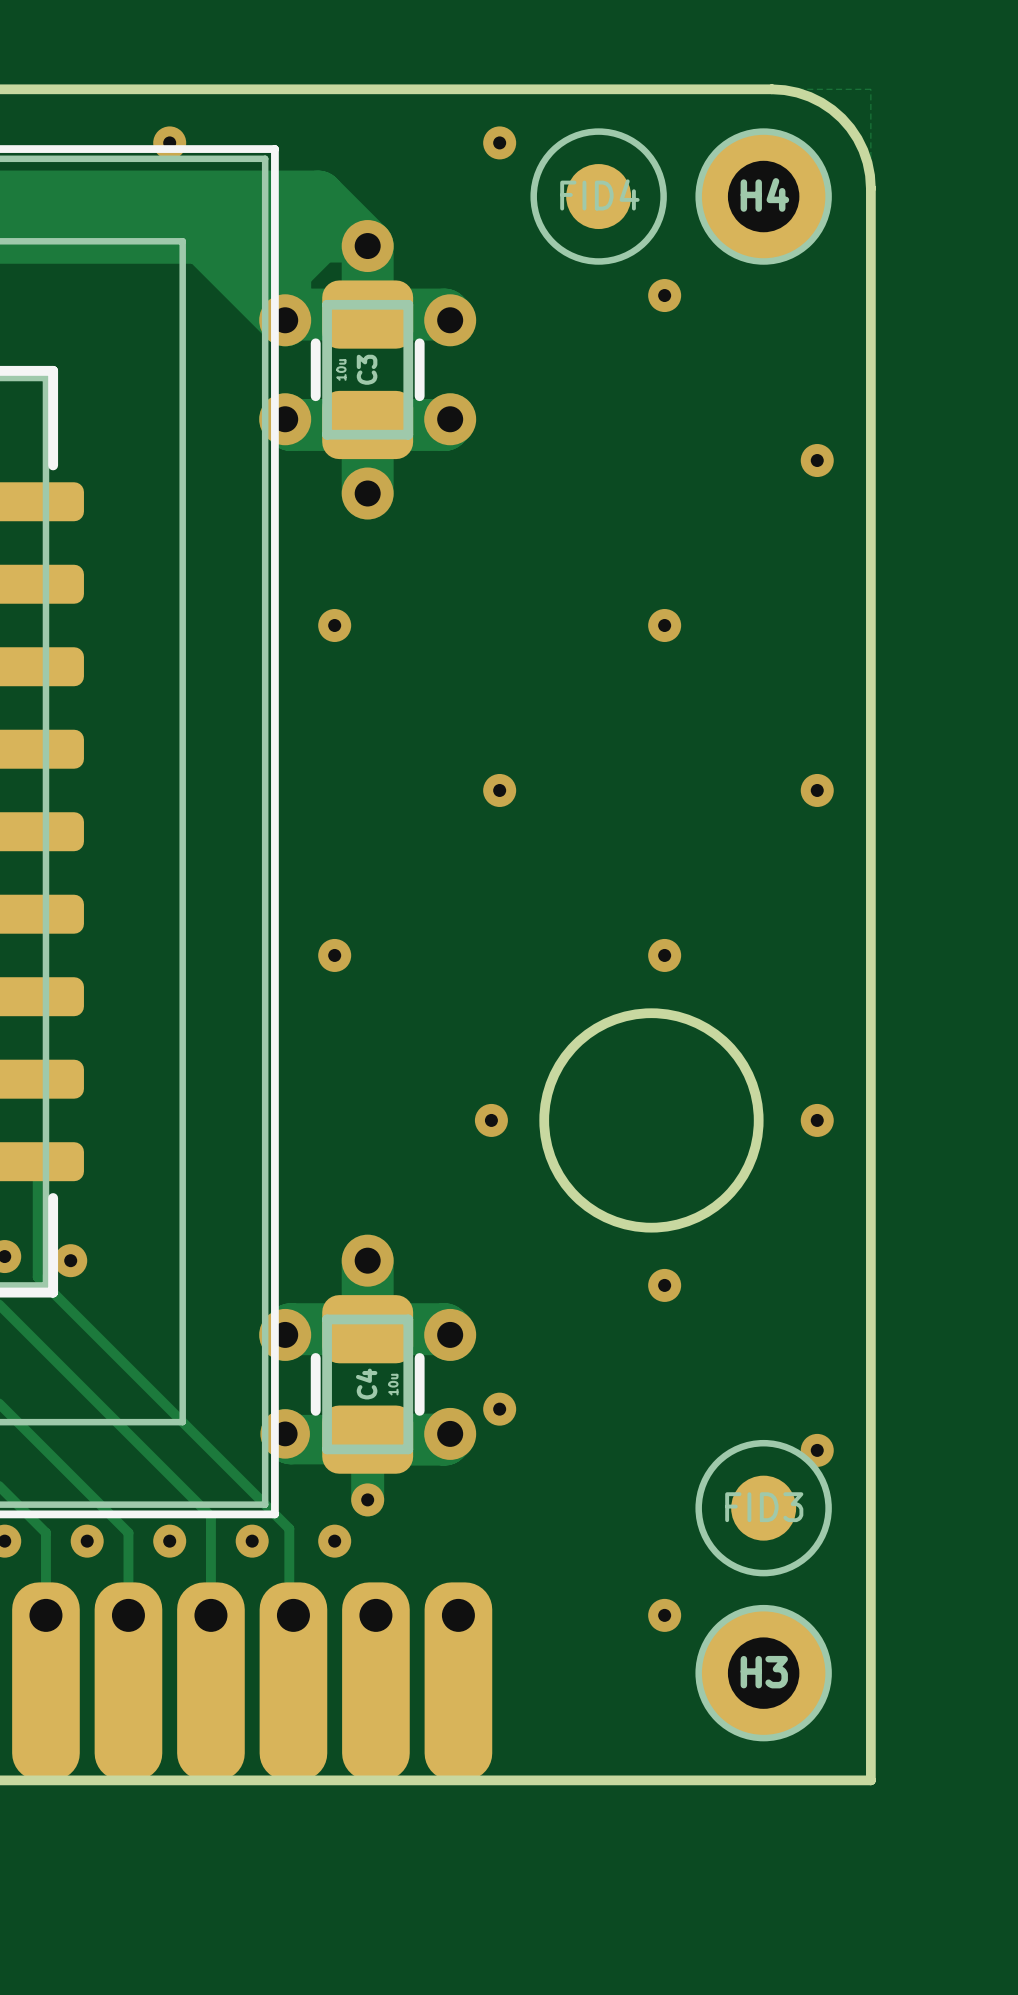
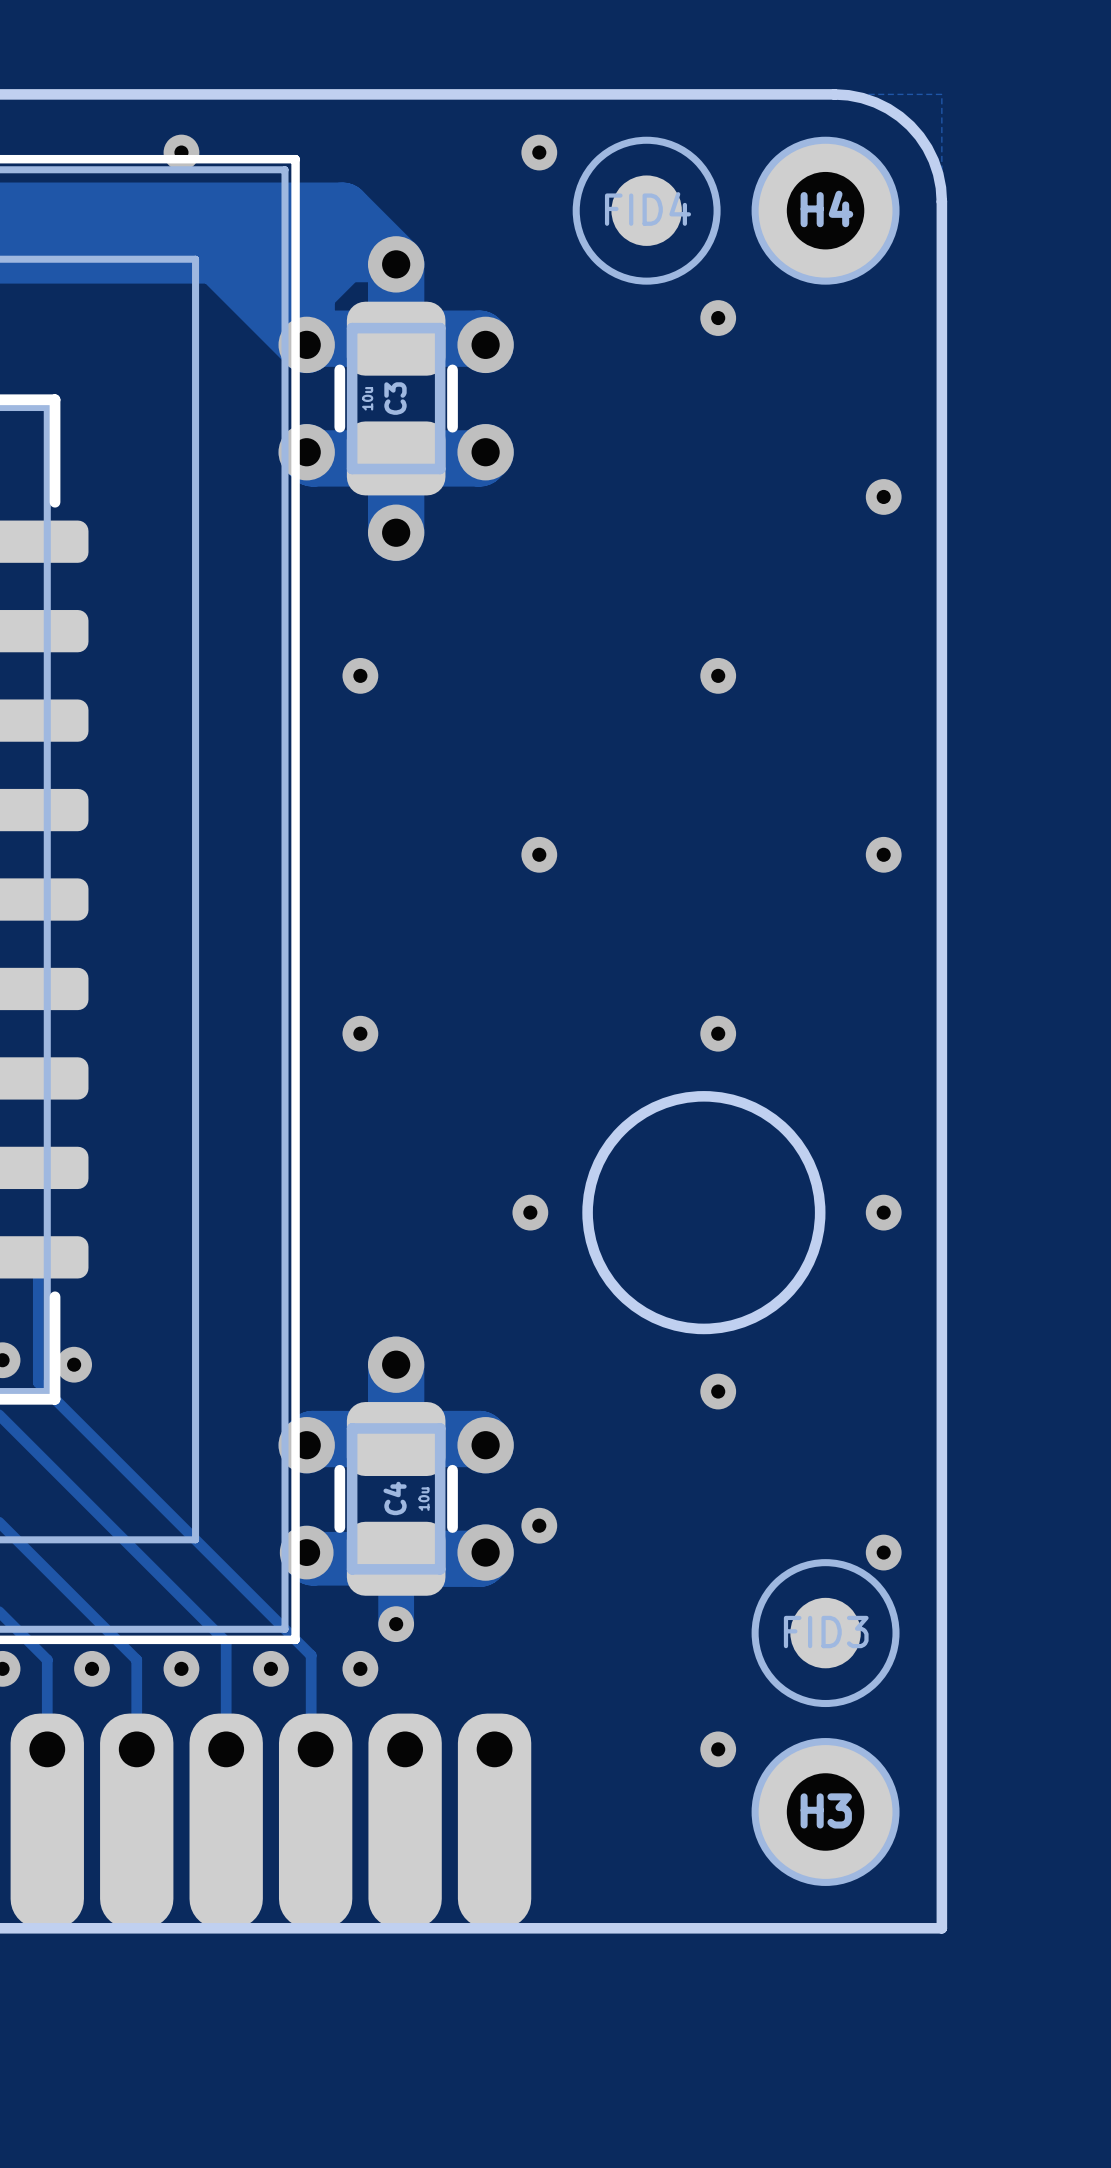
via position: (817, 1450) -> (883, 1552)

